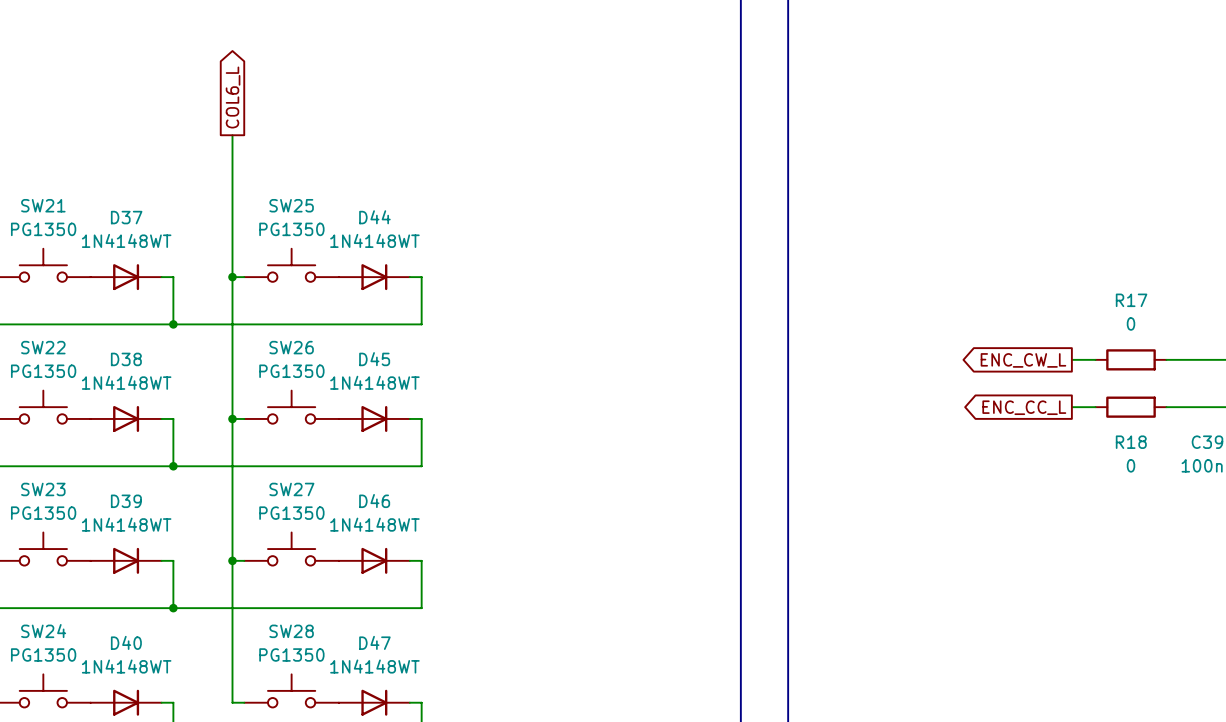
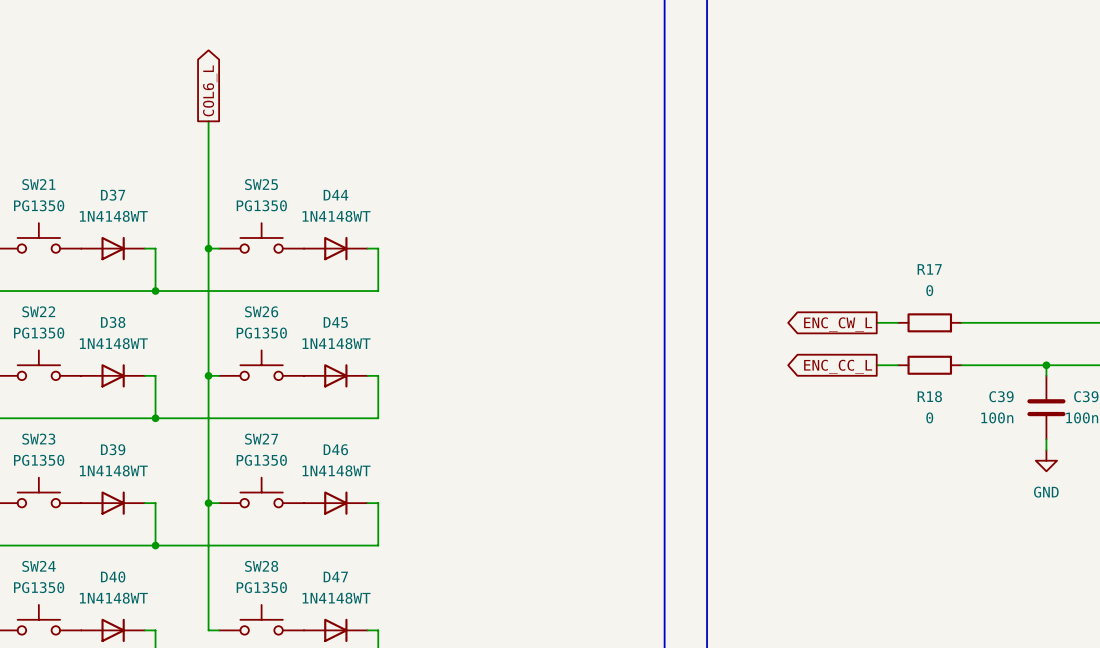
wire: none -> (876, 322) (897, 322)
wire: none -> (982, 322) (1046, 322)
R17 position: (1131, 359) -> (929, 322)
global label position: ENC_CW_L (1023, 360) -> ENC_CW_L (838, 324)
wire: none -> (876, 365) (897, 365)
global label position: ENC_CC_L (1024, 407) -> ENC_CC_L (838, 366)
wire: none -> (982, 365) (1046, 365) (1046, 375)
R18 position: (1131, 407) -> (929, 365)
junction: none -> (1046, 365)
C39: none -> 100n (1046, 407)
wire: none -> (1046, 439) (1046, 450)
power symbol: none -> GND (1046, 460)

